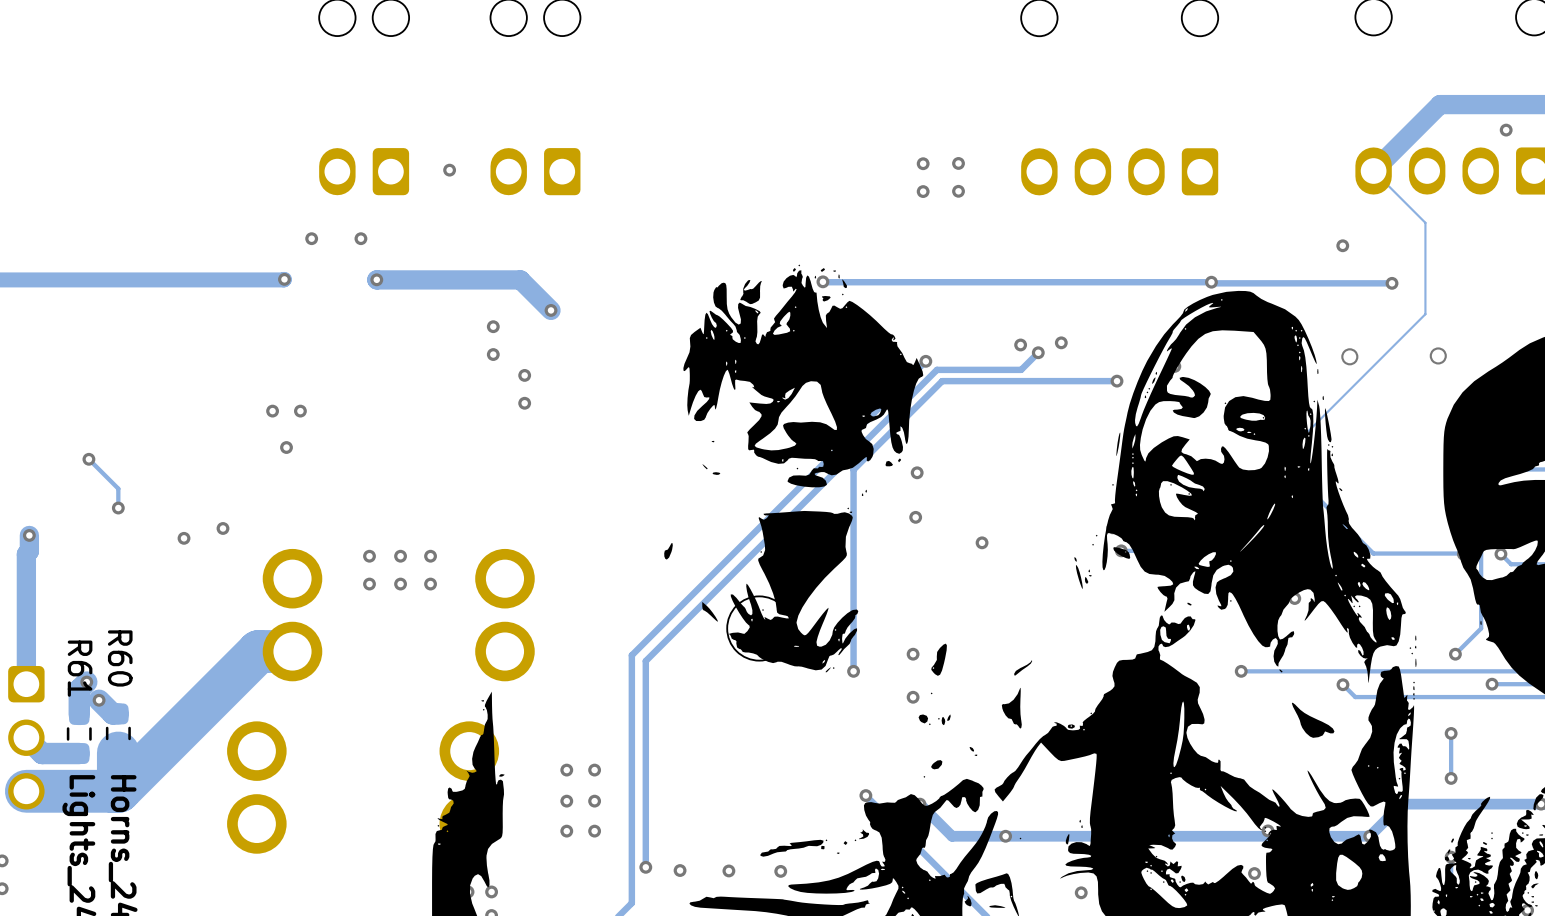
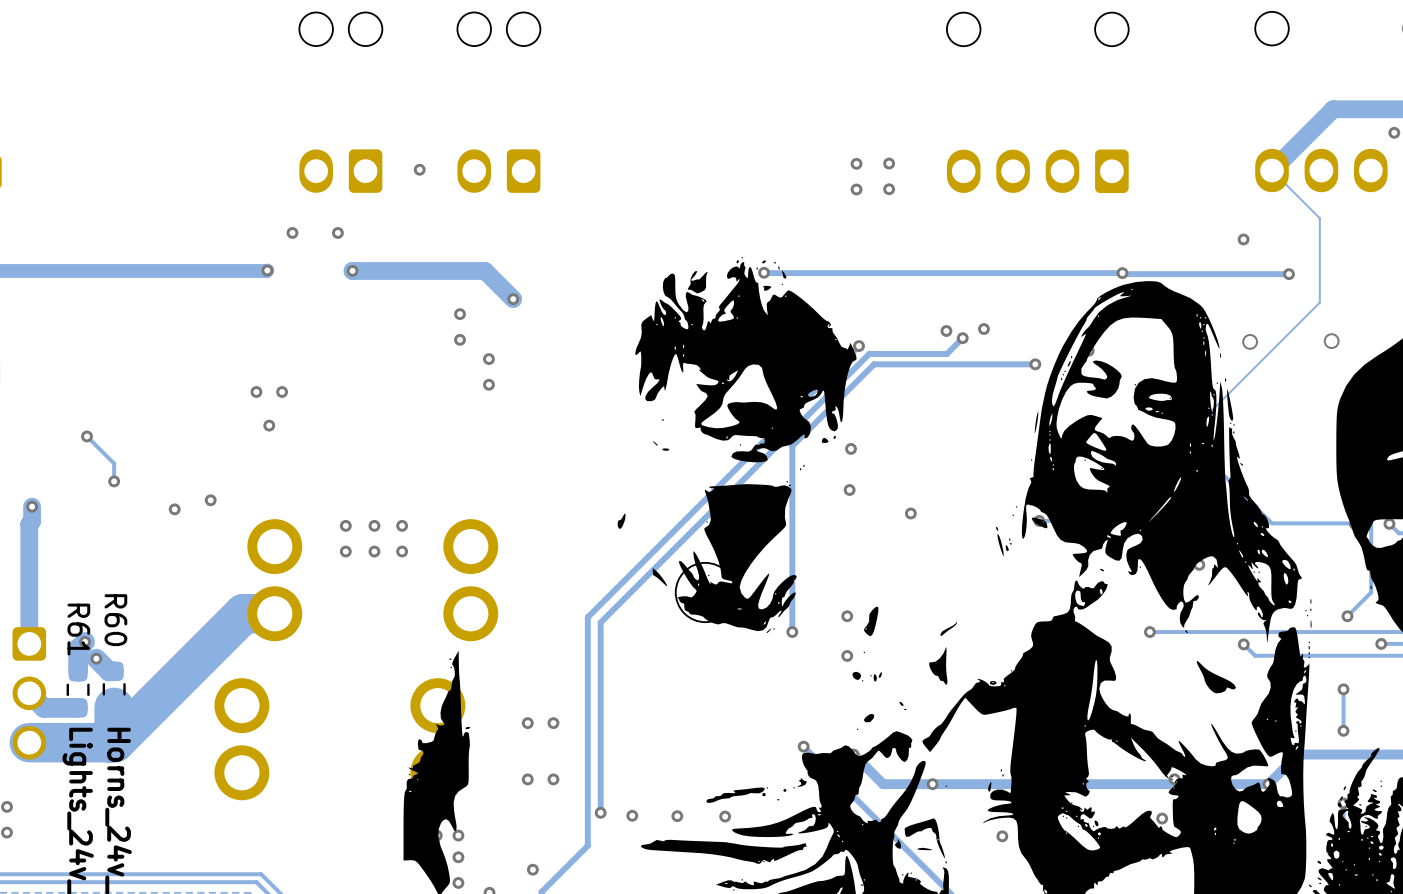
via: (566, 801) -> none
via: (594, 801) -> none

